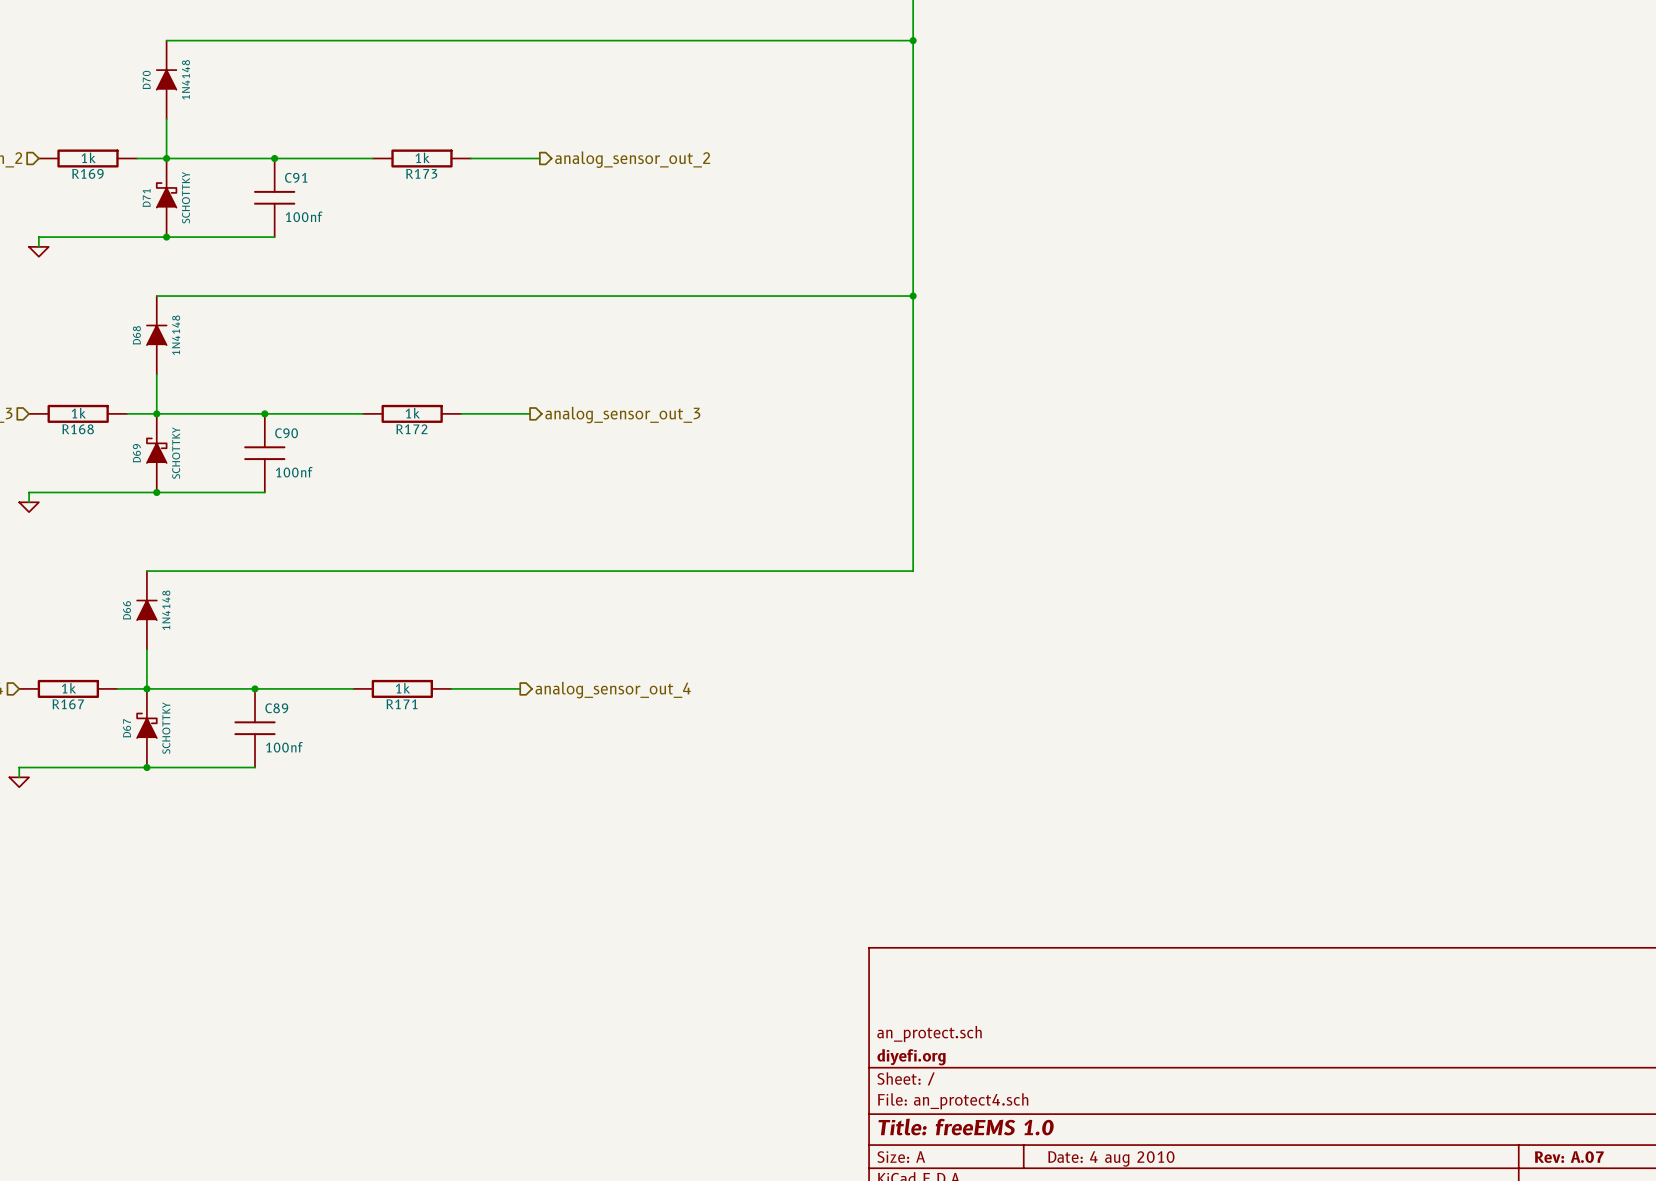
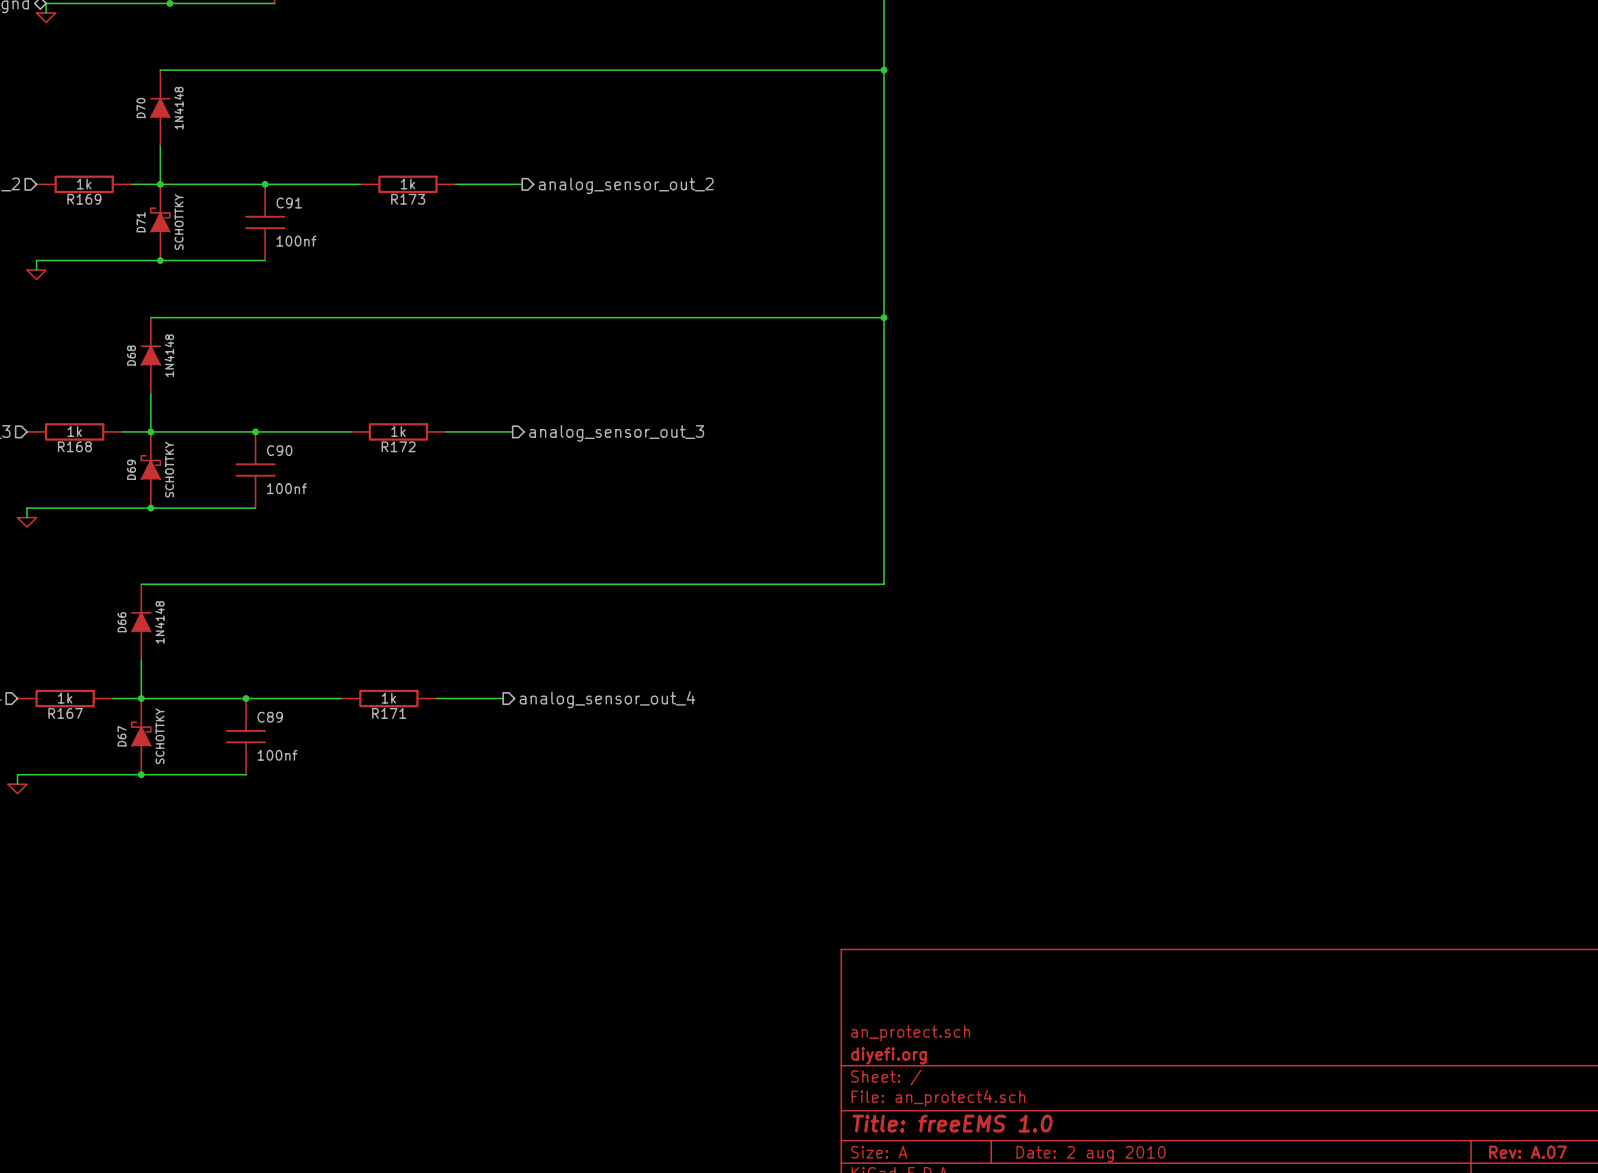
title block: Date: 4 aug 2010 (1111, 1158) -> Date: 2 aug 2010 (1091, 1154)

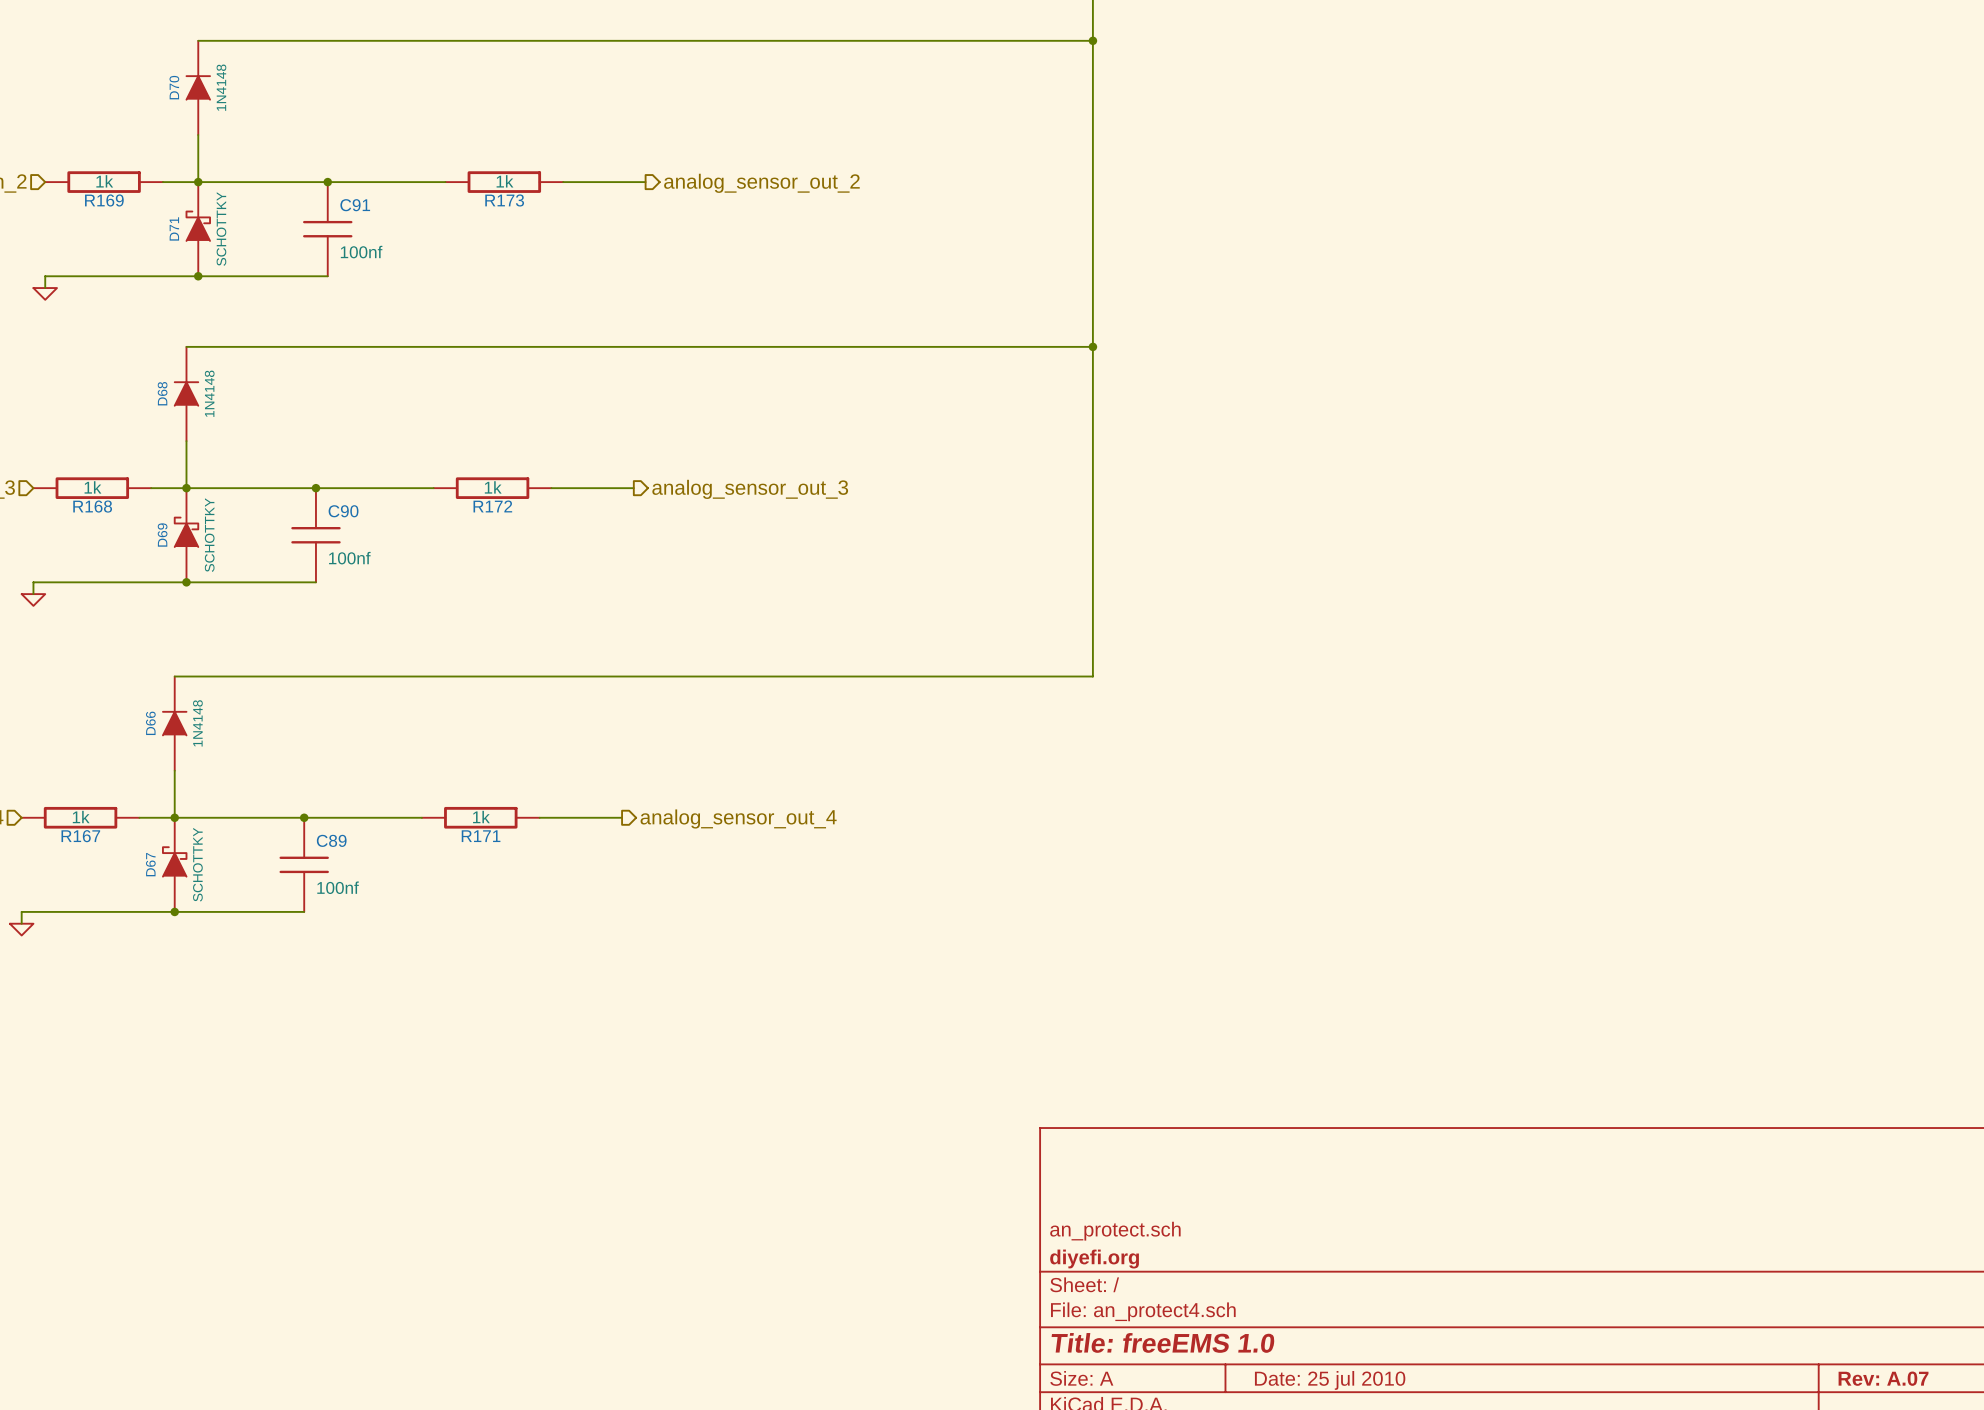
title block: Date: 2 aug 2010 (1091, 1154) -> Date: 25 jul 2010 (1330, 1380)

